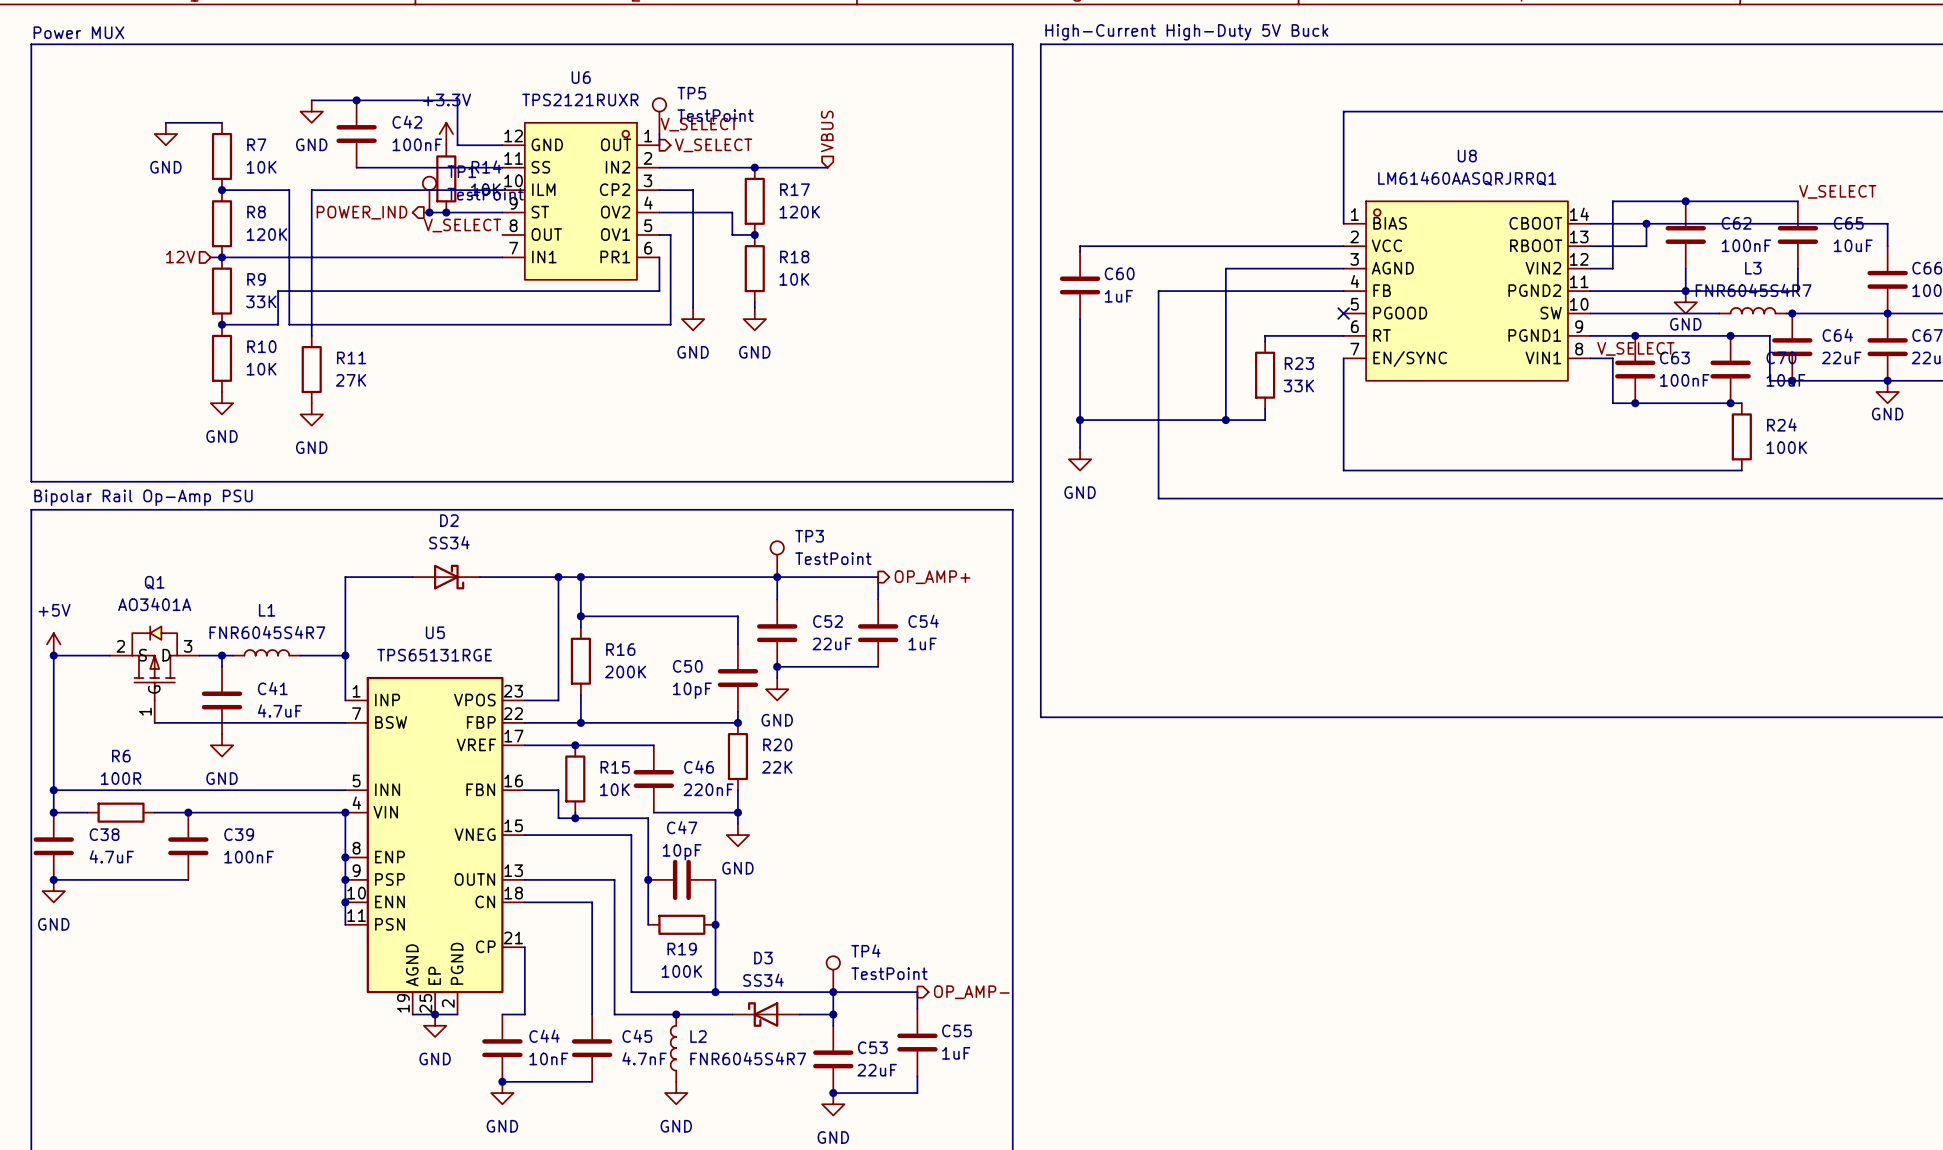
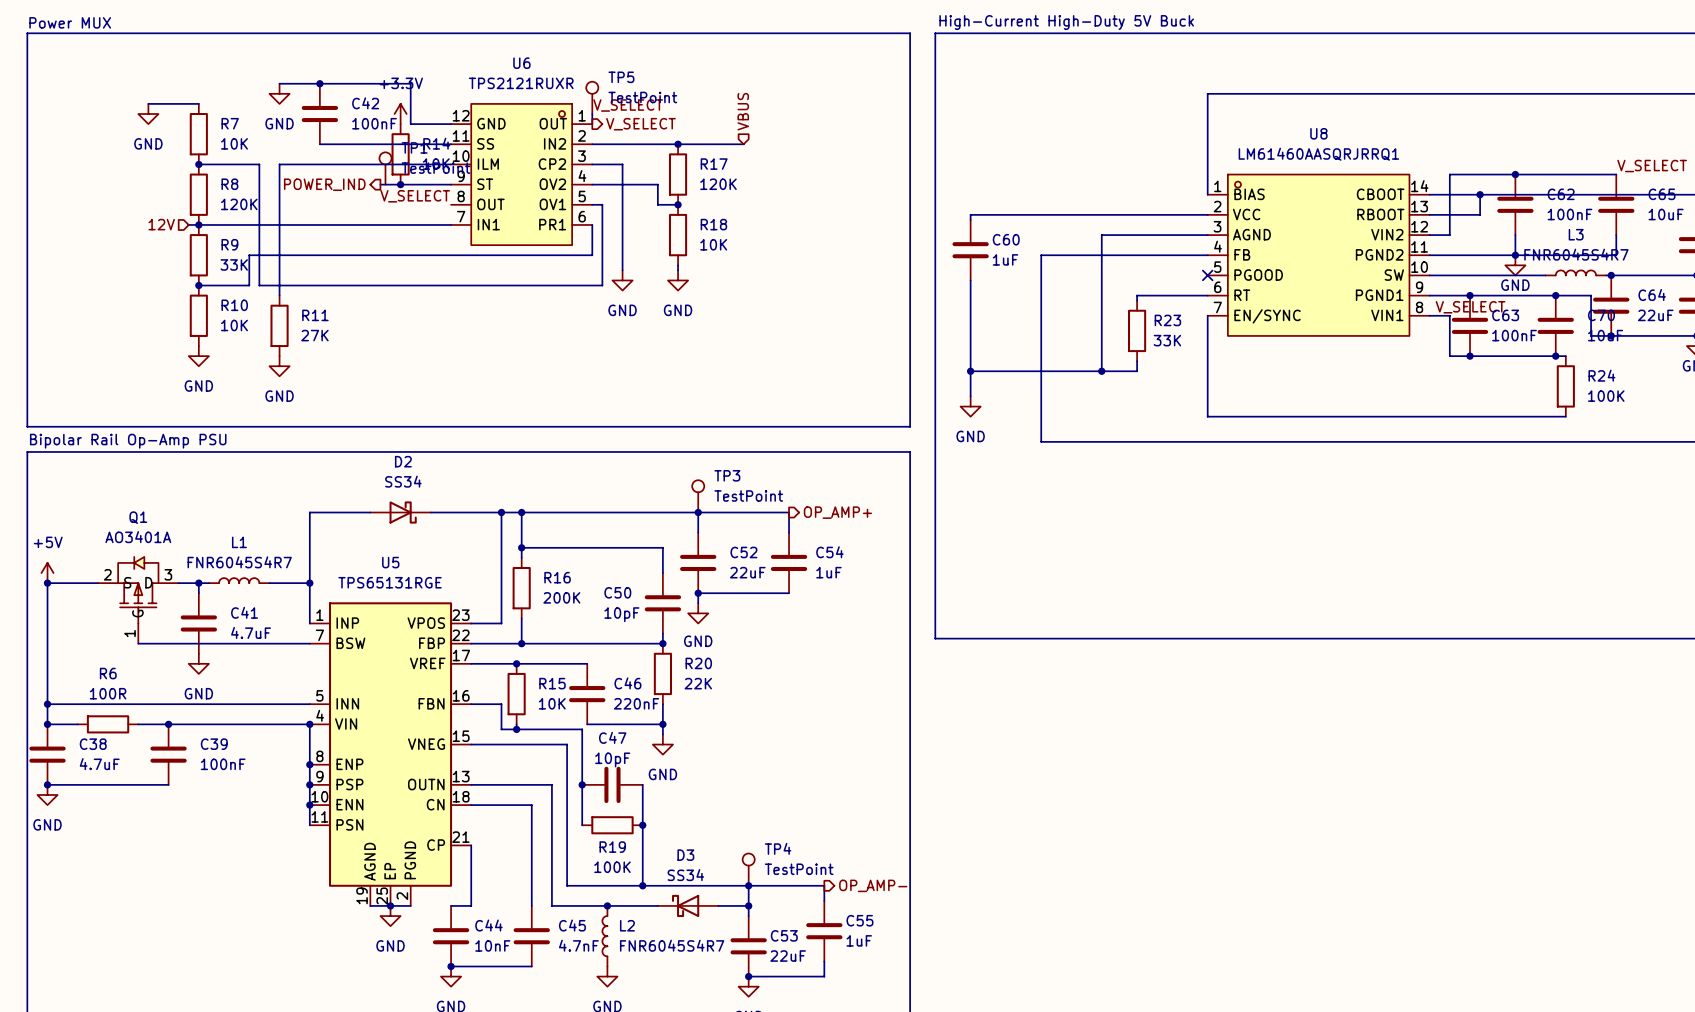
junction: (429, 212) -> none

